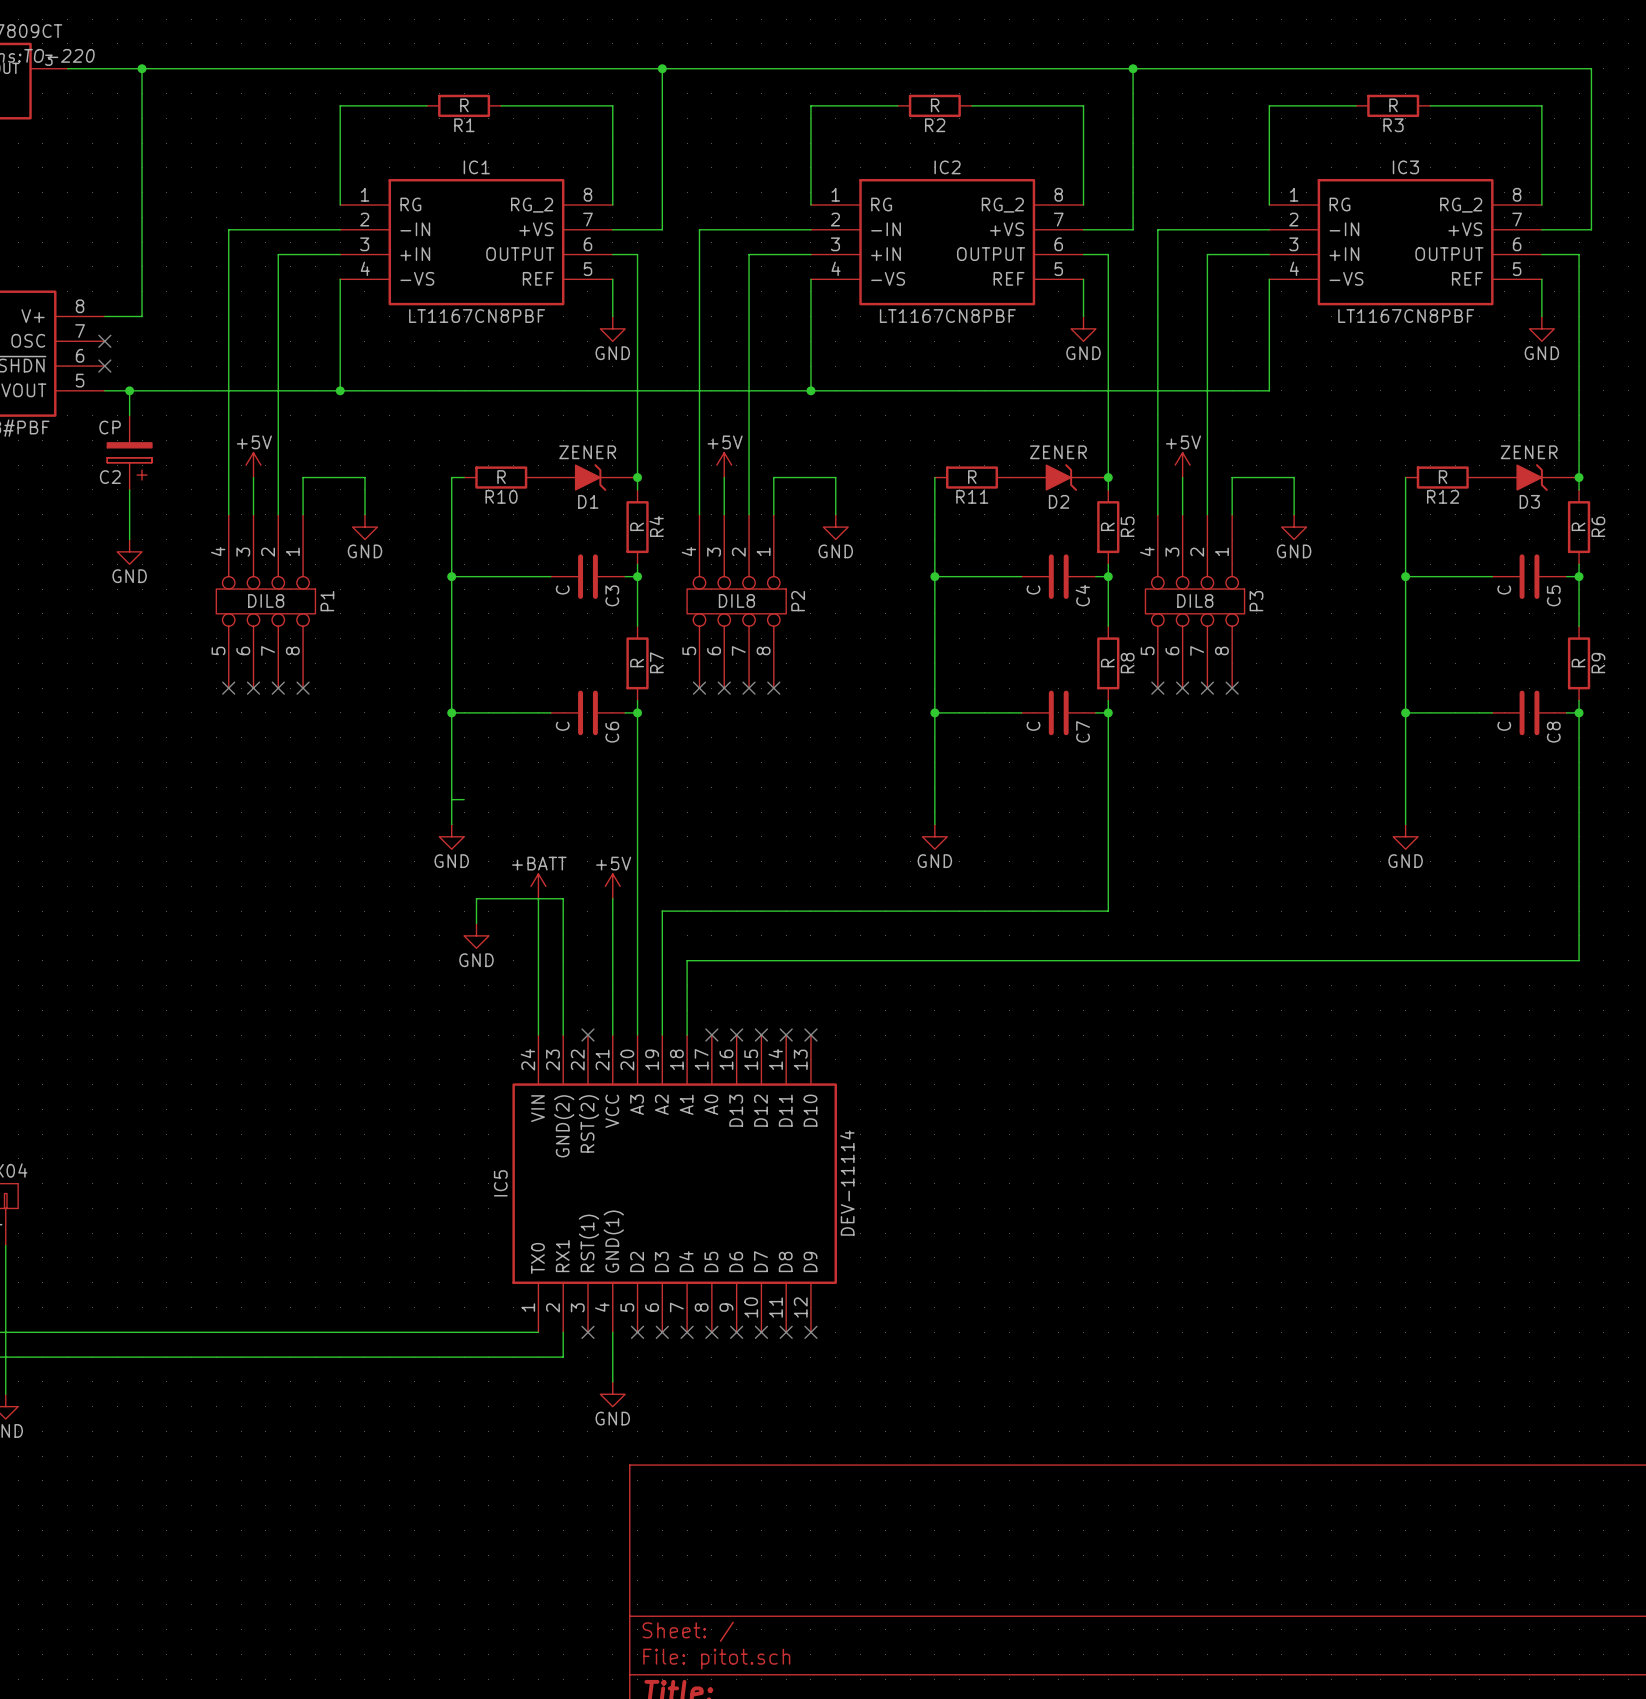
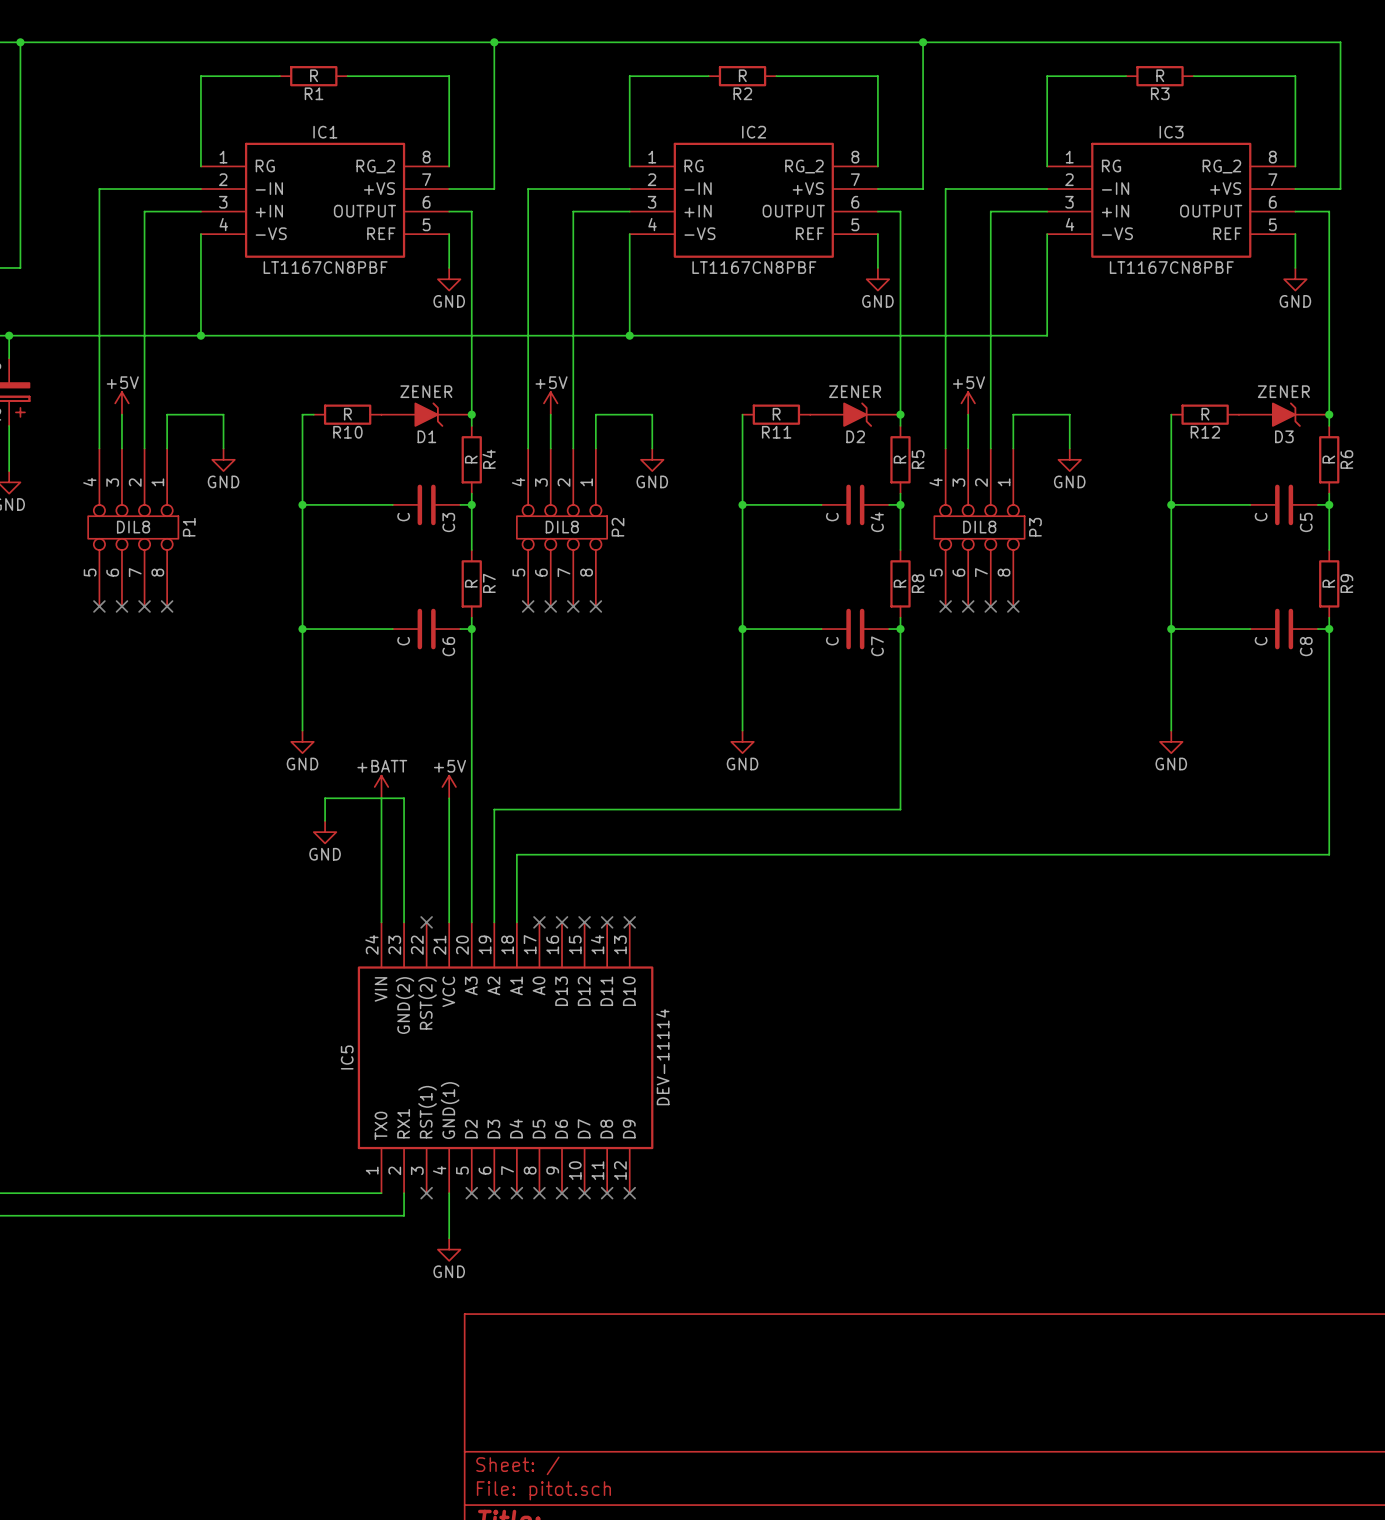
wire: (451, 799) (464, 799) -> none

